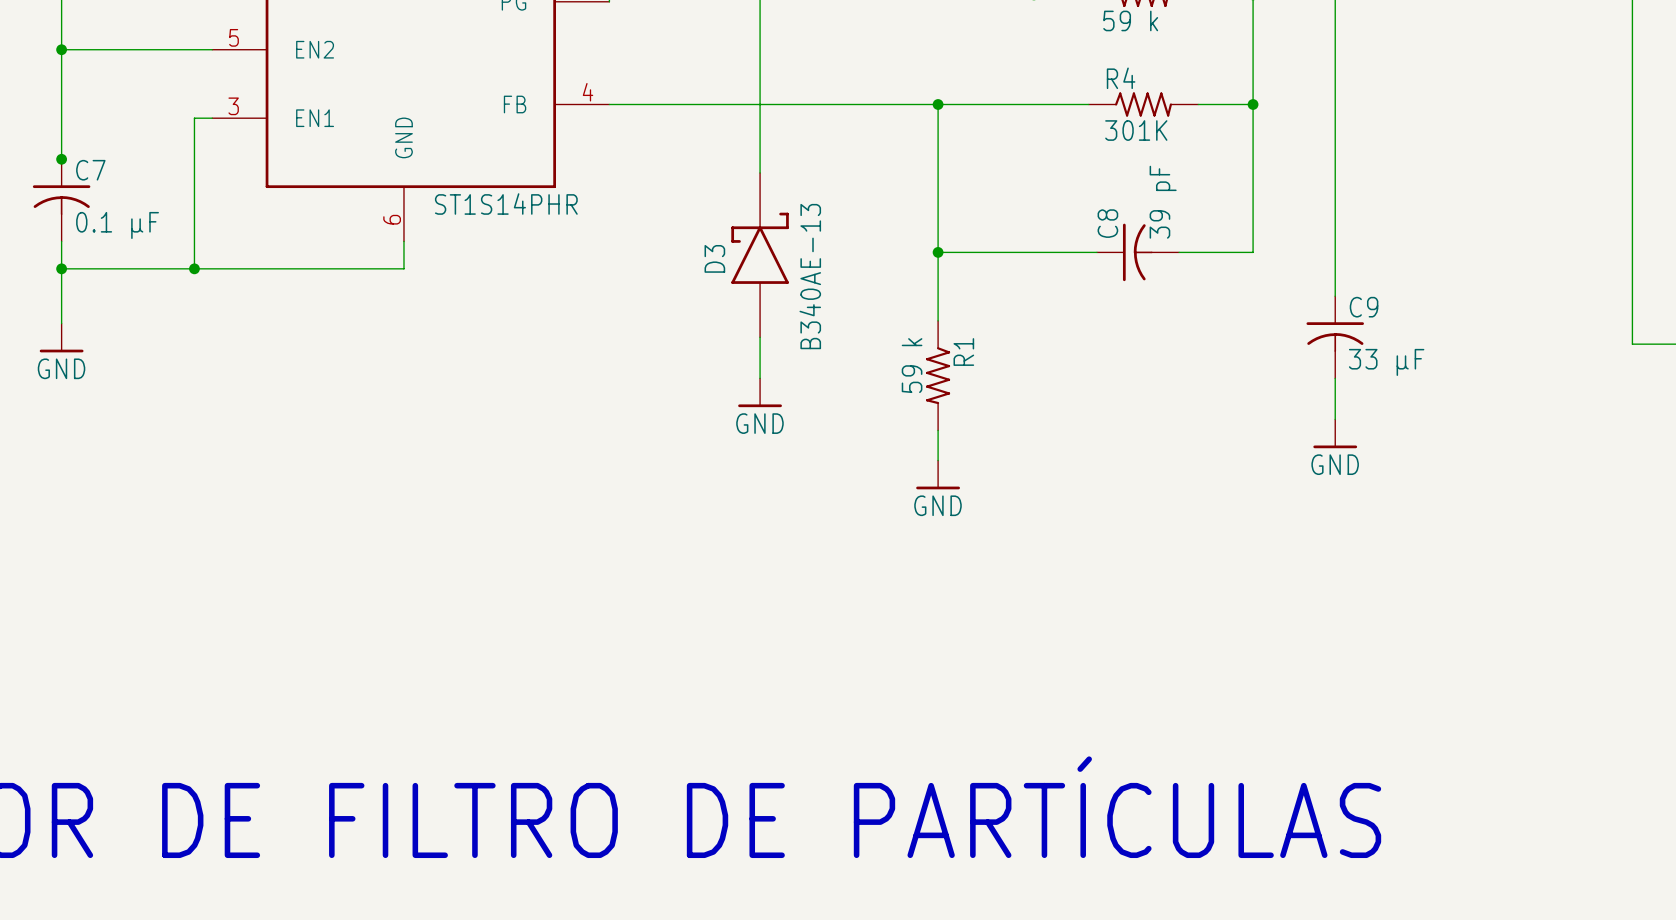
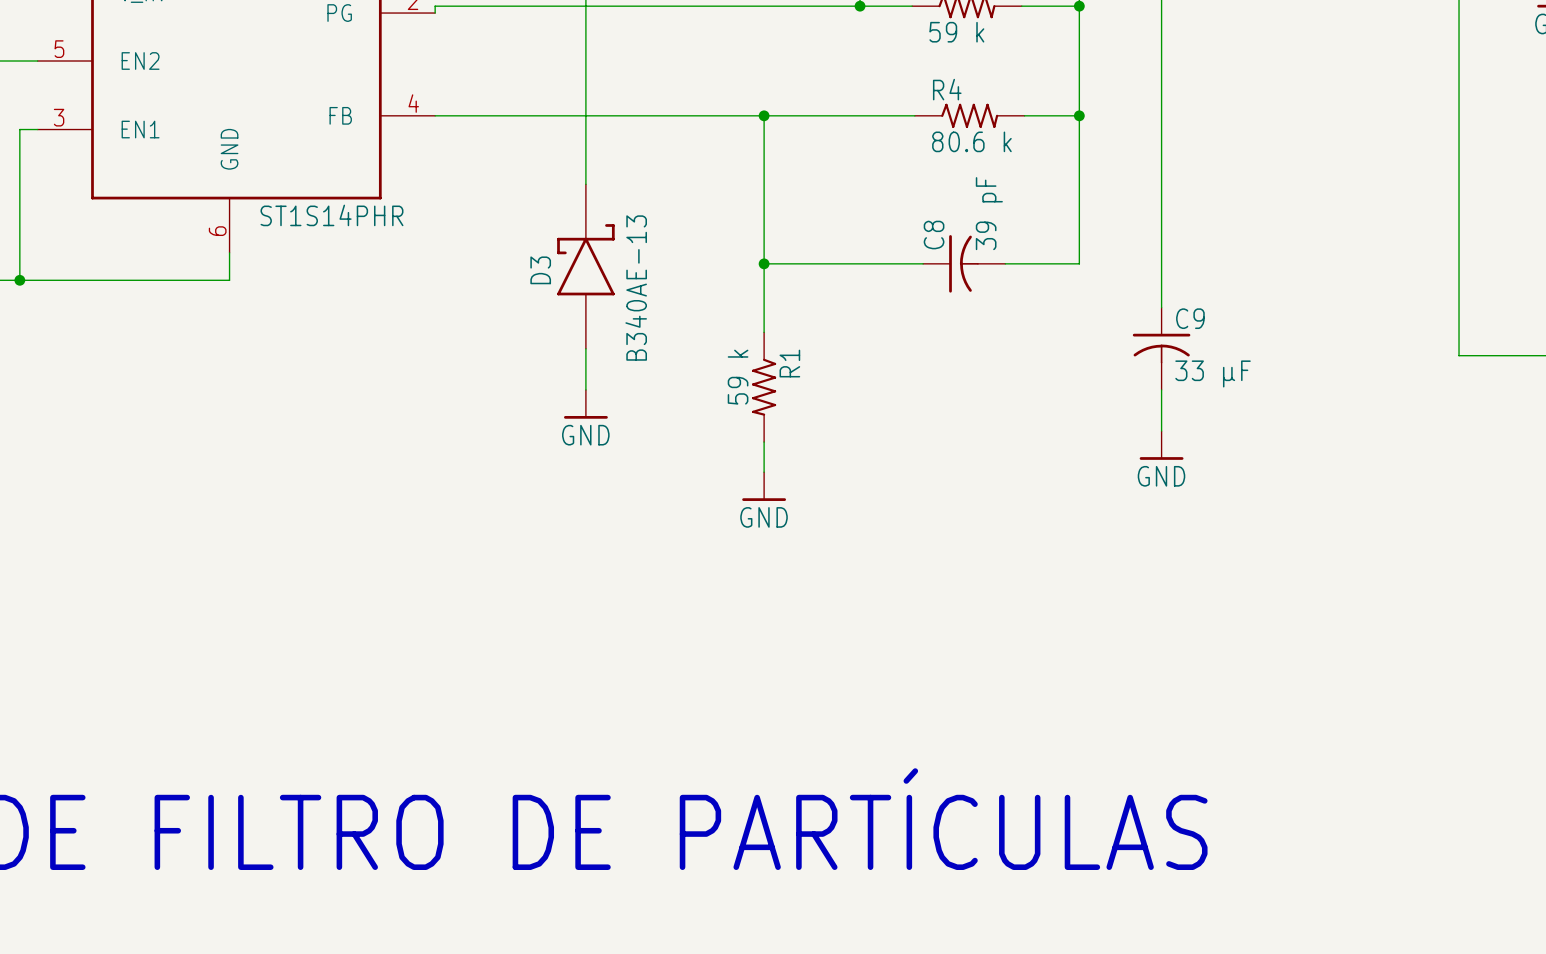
R4 value: 301K (1136, 130) -> 80.6 k (971, 141)

